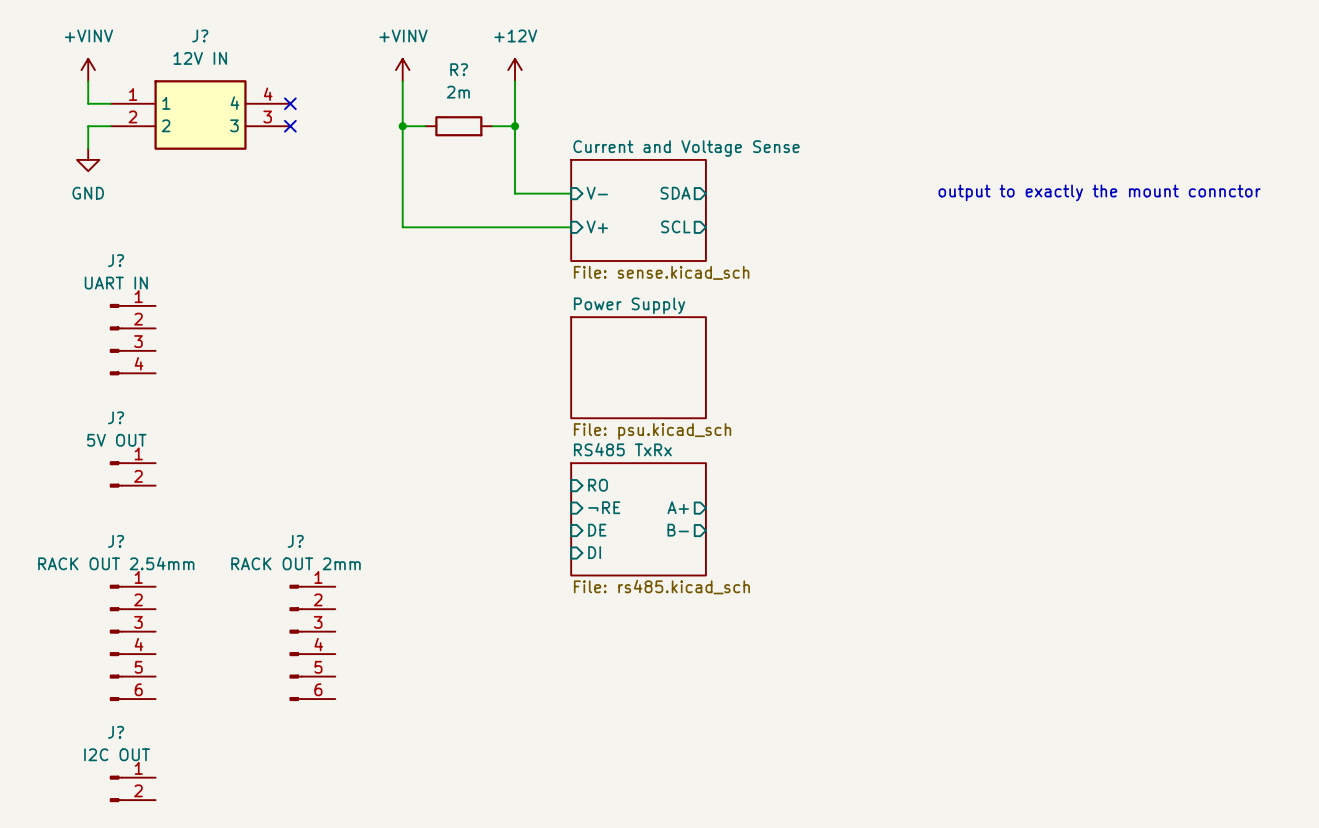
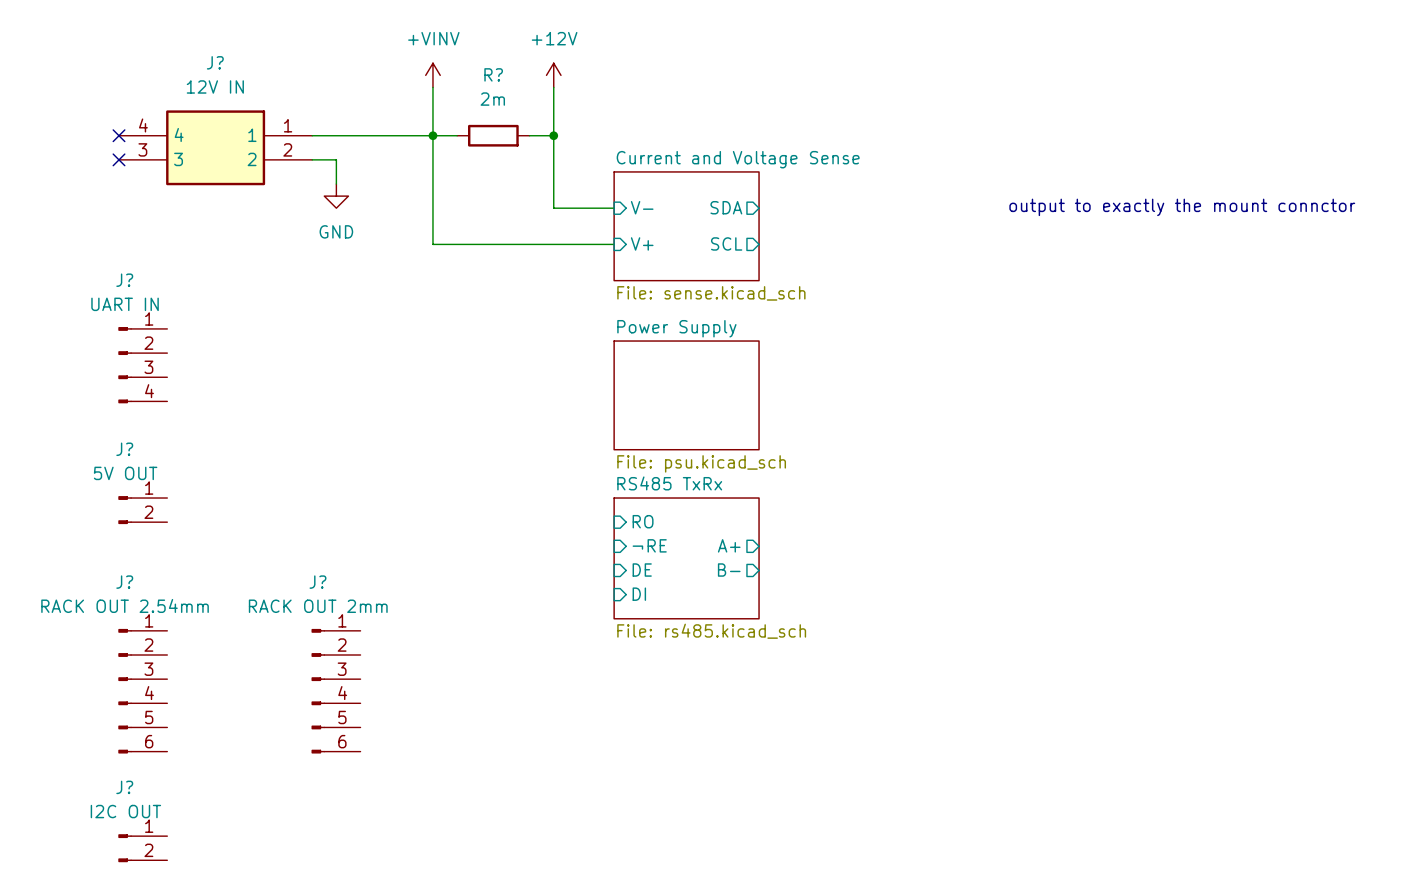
power symbol: +VINV (88, 70) -> none
wire: (88, 81) (88, 103) (110, 103) -> none
no-connect mark: (290, 103) -> none
J?: 12V IN (200, 115) -> none
wire: (110, 126) (88, 126) (88, 148) -> none
no-connect mark: none -> (119, 135)
wire: none -> (312, 135) (432, 135)
no-connect mark: (290, 126) -> none
J?: none -> 12V IN (215, 147)
no-connect mark: none -> (119, 159)
wire: none -> (312, 159) (336, 159) (336, 184)
power symbol: GND (88, 159) -> none
power symbol: none -> GND (336, 196)

